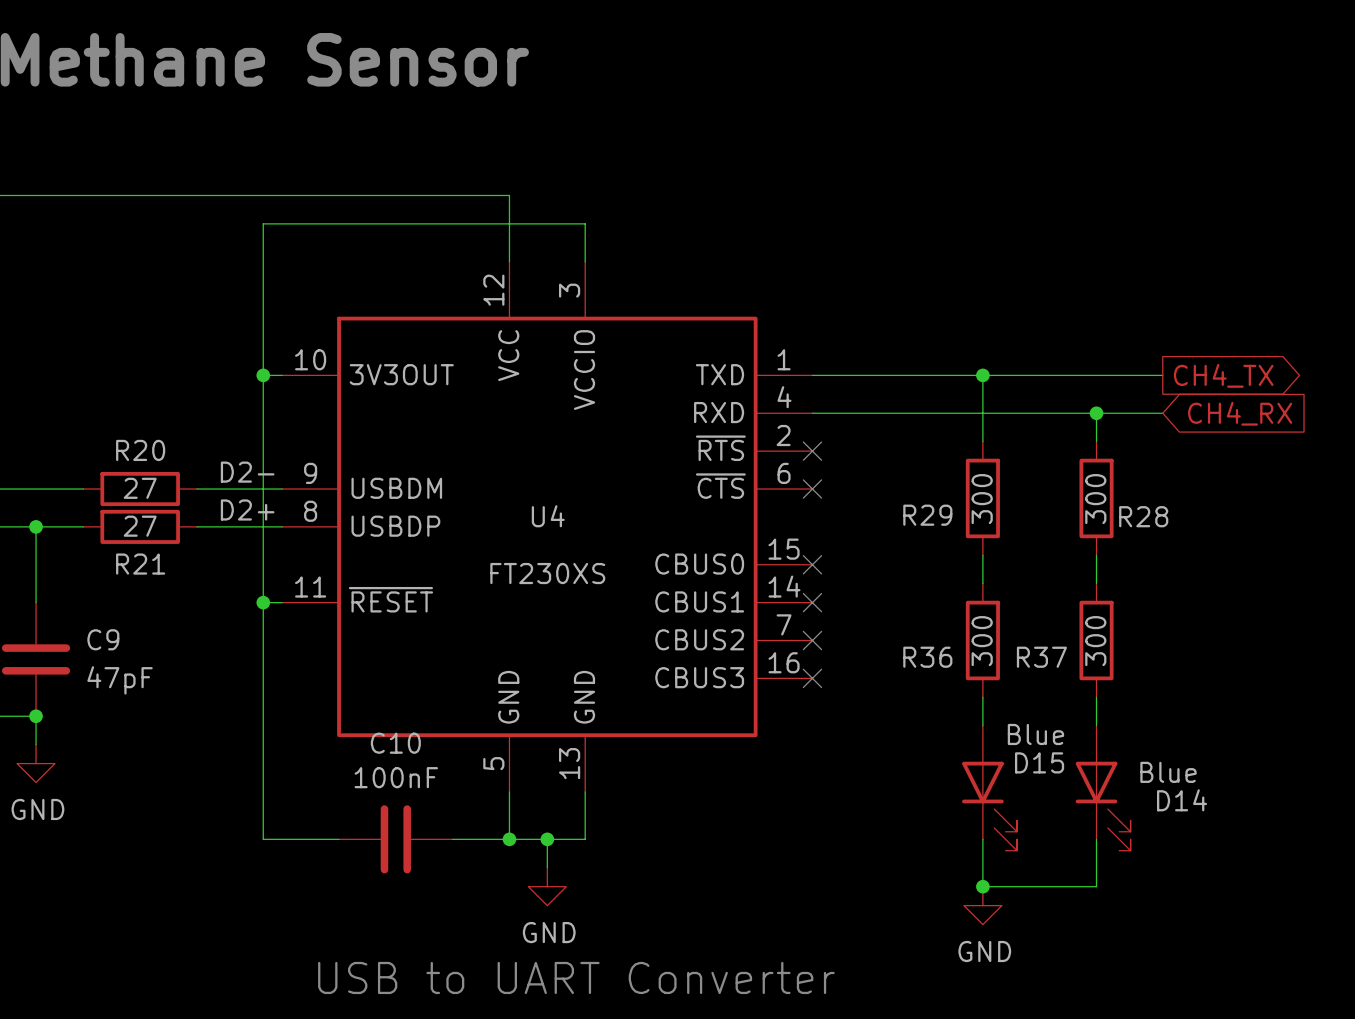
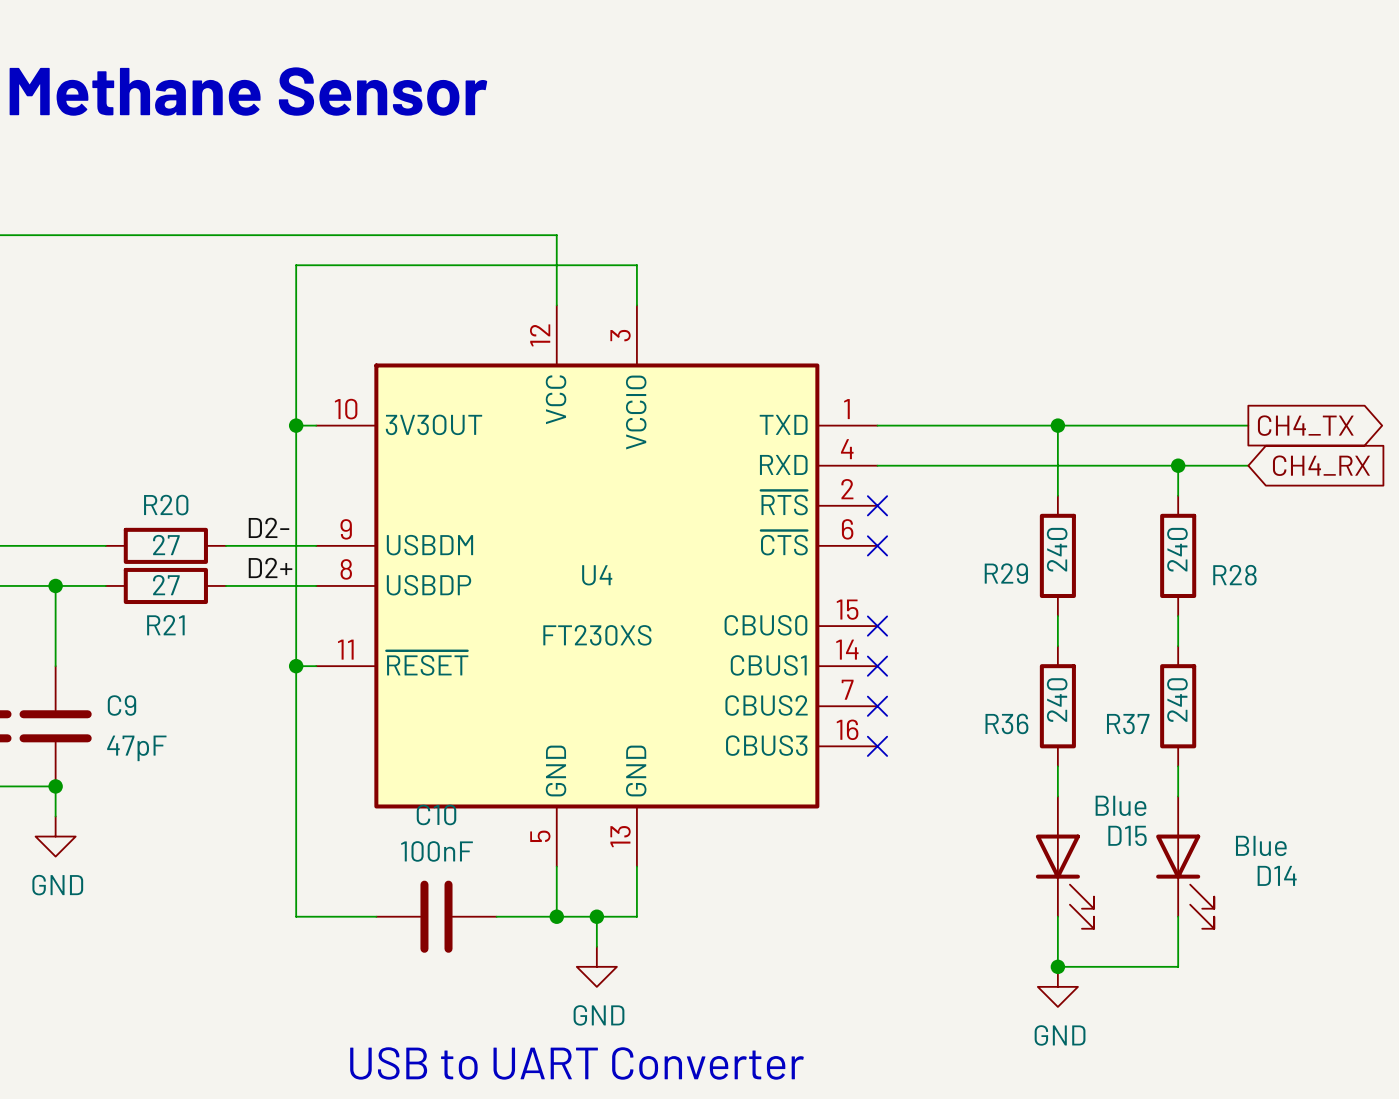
R29 value: 300 (982, 499) -> 240 (1057, 549)
R28 value: 300 (1095, 499) -> 240 (1177, 549)
R36 value: 300 (982, 641) -> 240 (1057, 700)
R37 value: 300 (1095, 641) -> 240 (1177, 700)

